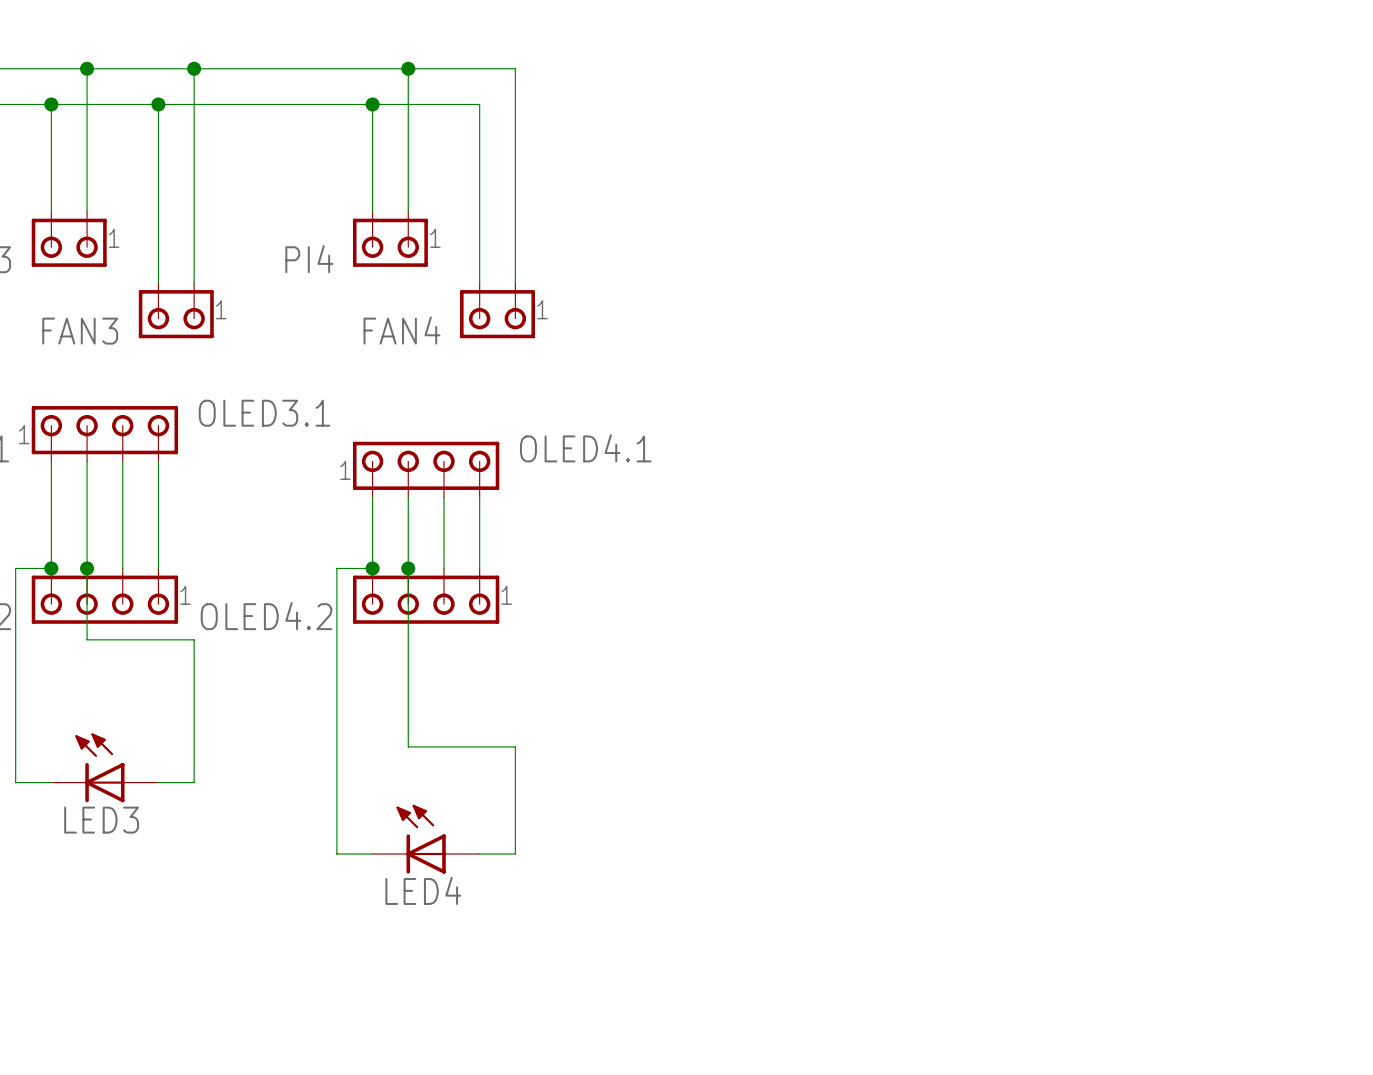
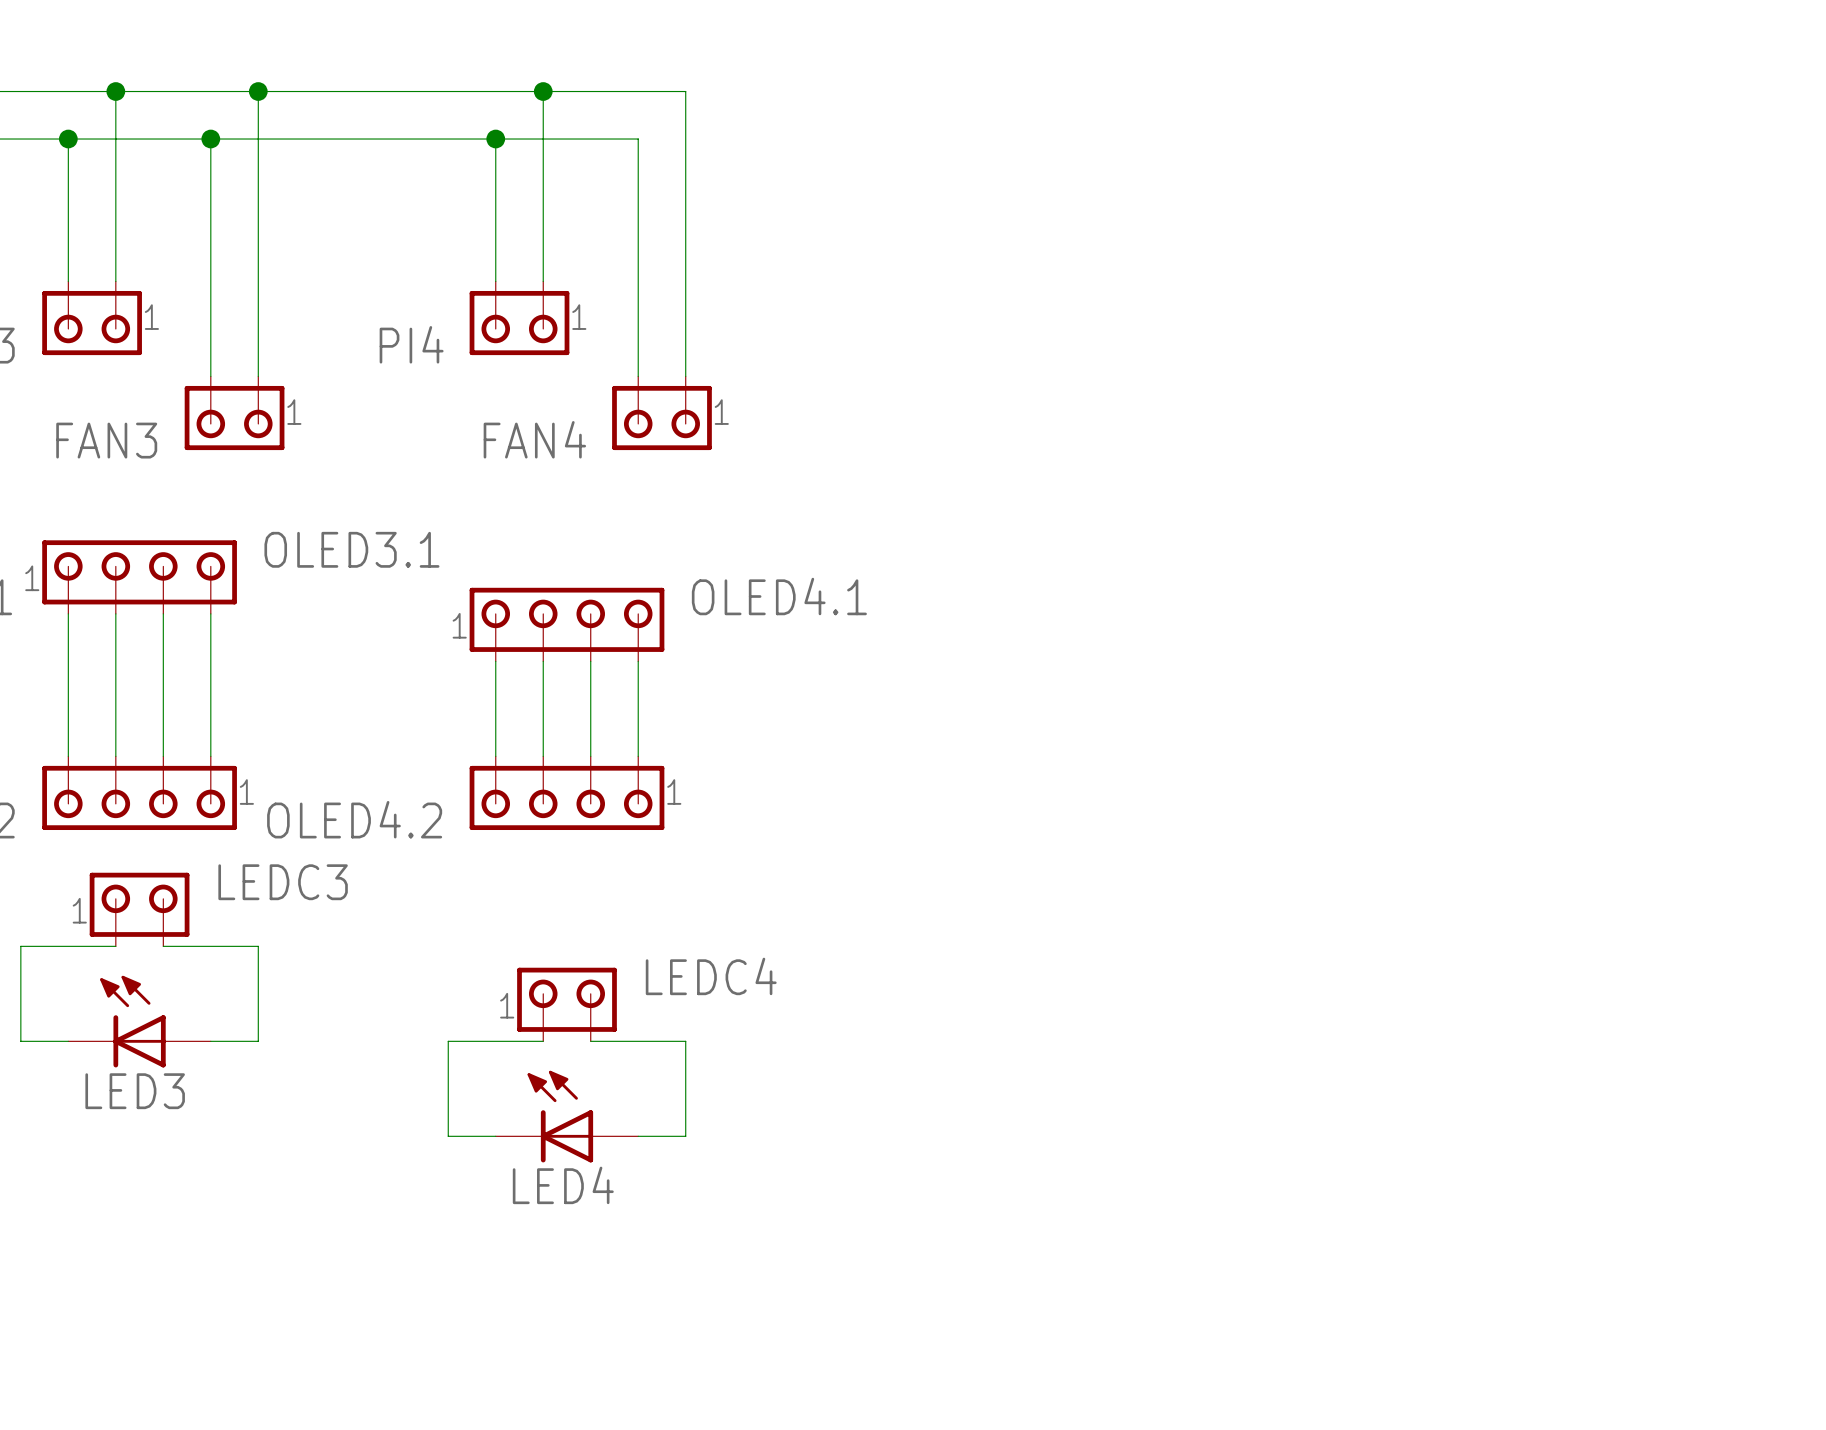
wire: (51, 568) (15, 568) (15, 711) -> (115, 946) (20, 946)
junction: (51, 568) -> none
wire: (87, 568) (87, 639) (194, 639) (194, 711) -> (163, 946) (258, 946)
junction: (87, 568) -> none
wire: (372, 568) (336, 568) (336, 782) -> (543, 1041) (448, 1041)
junction: (372, 568) -> none
wire: (408, 568) (408, 746) (515, 746) (515, 782) -> (590, 1041) (685, 1041)
junction: (408, 568) -> none
LEDC3: none -> (139, 909)
LEDC4: none -> (566, 1004)

